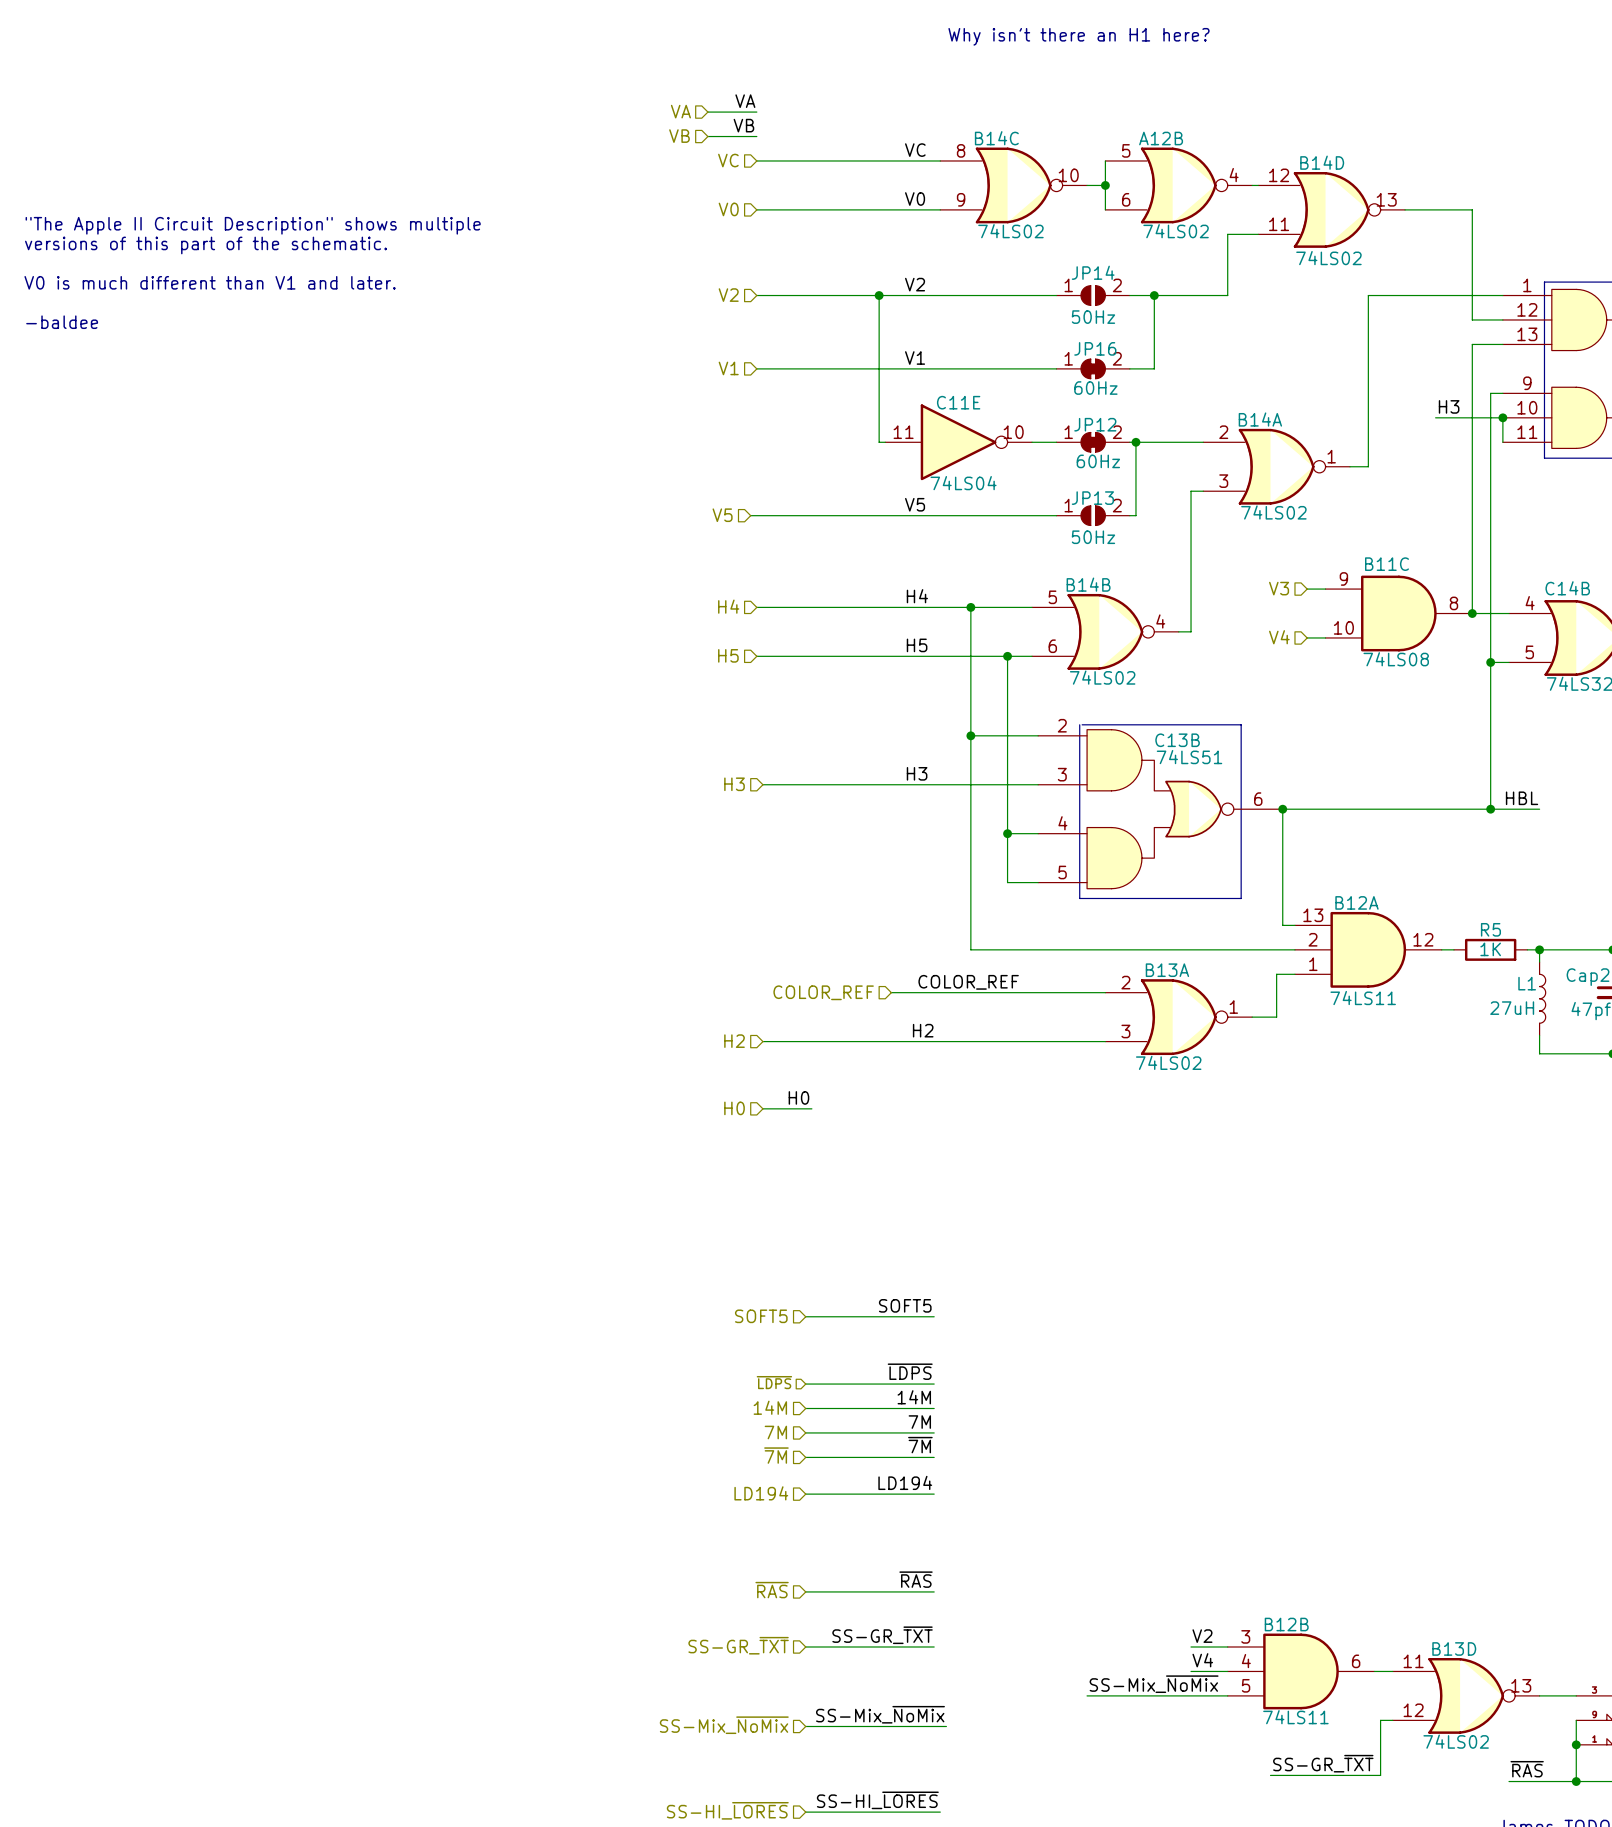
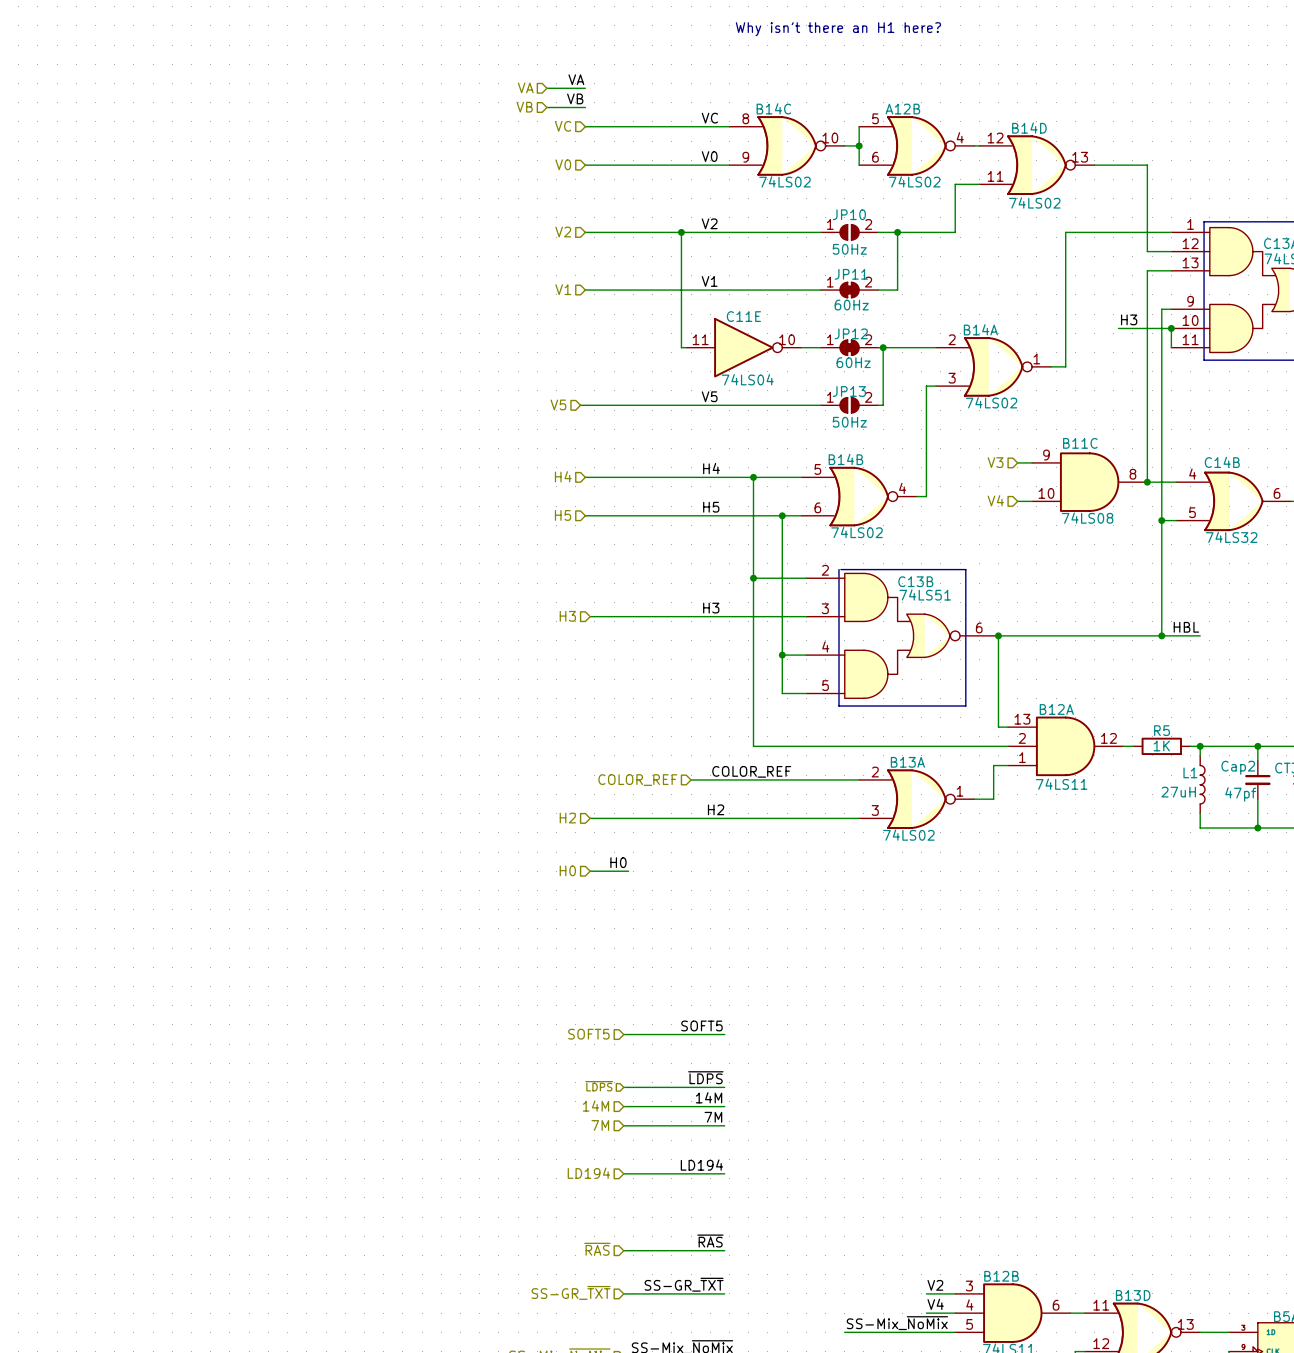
text: "The Apple II Circuit Description" shows multiple (253, 225) -> none
text: versions of this part of the schematic. (205, 245) -> none
JP14 name: JP14 (1093, 272) -> JP10 (849, 214)
text: V0 is much different than V1 and later. (210, 282) -> none
text: -baldee (62, 322) -> none
JP16 name: JP16 (1095, 348) -> JP11 (851, 274)
label: ~{7M} (920, 1445) -> none
hierarchical label: ~{7M} (776, 1455) -> none
wire: (805, 1457) (934, 1457) -> none

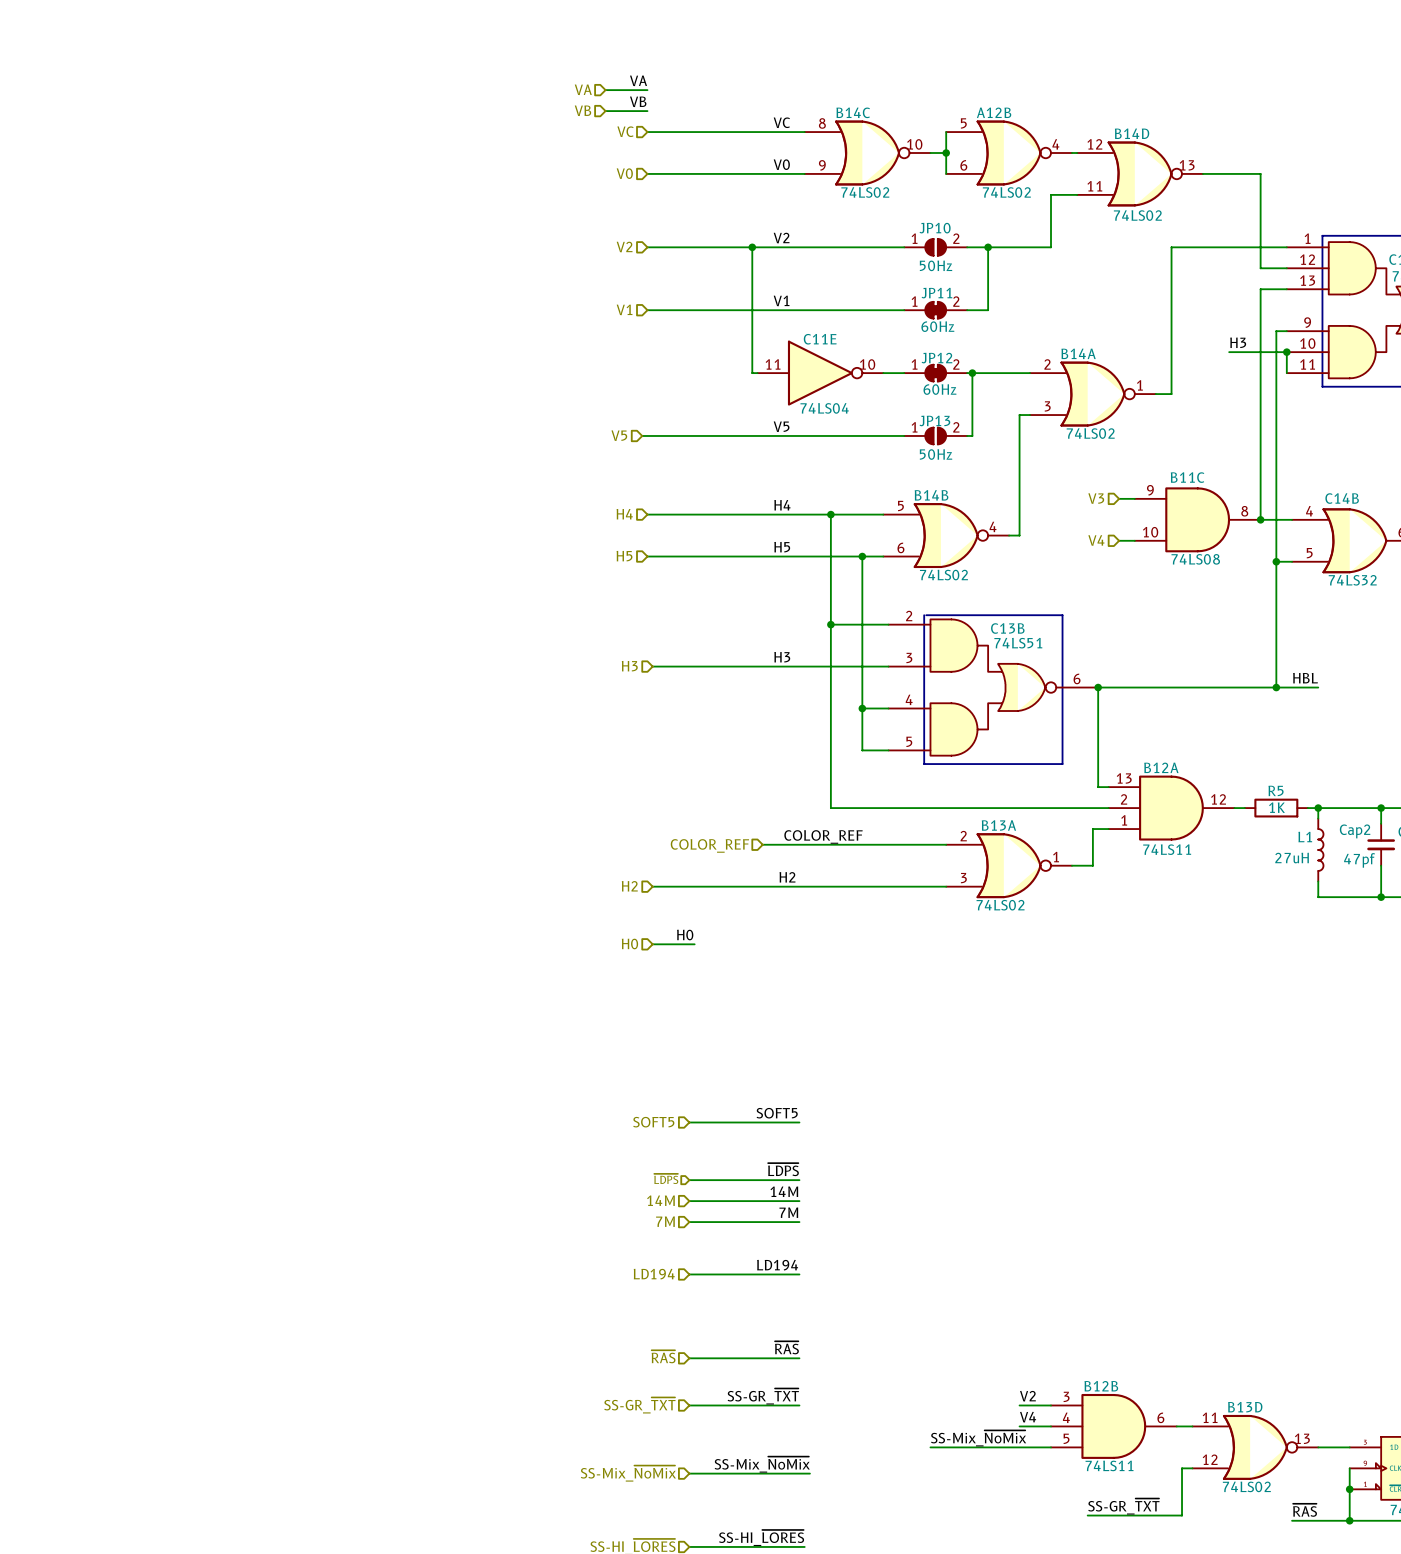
text: Why isn't there an H1 here? (838, 29) -> none

